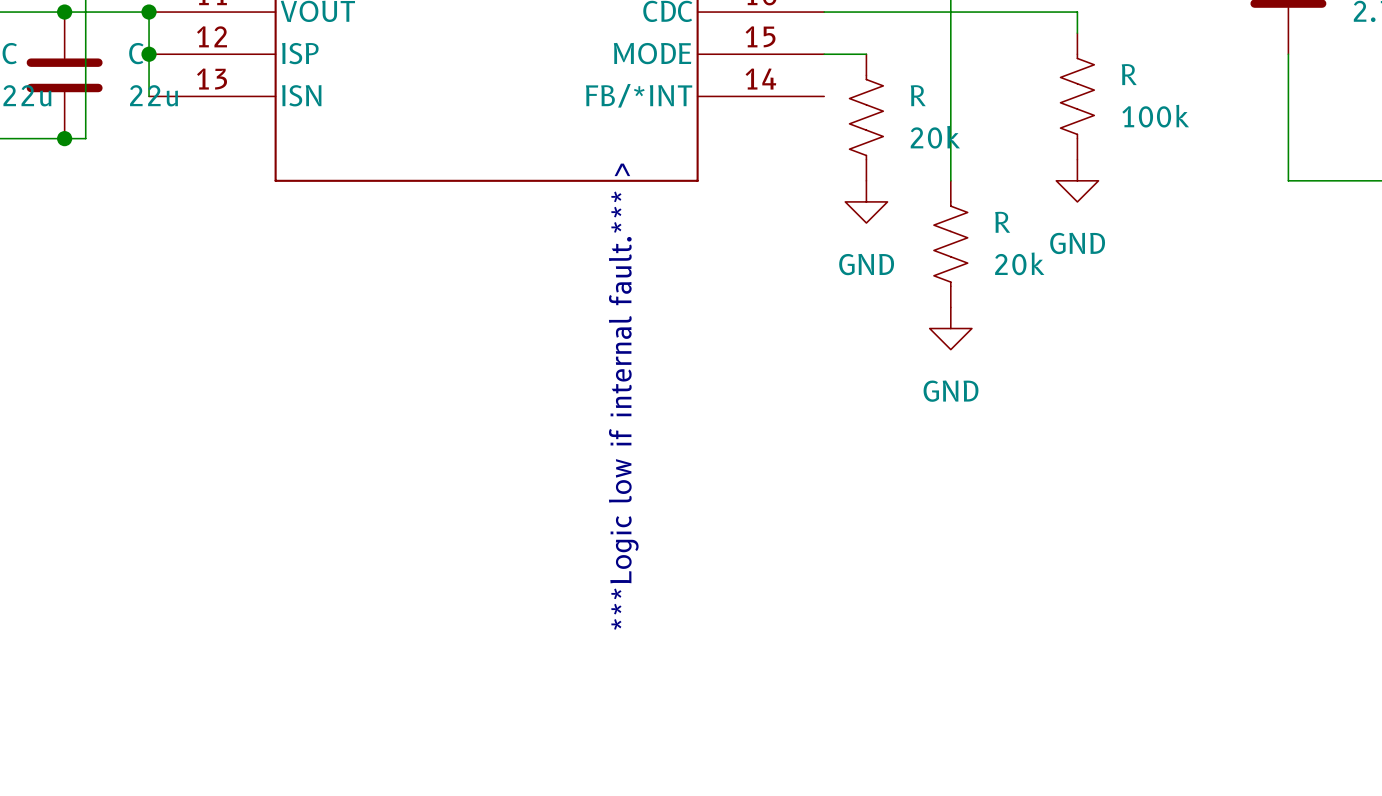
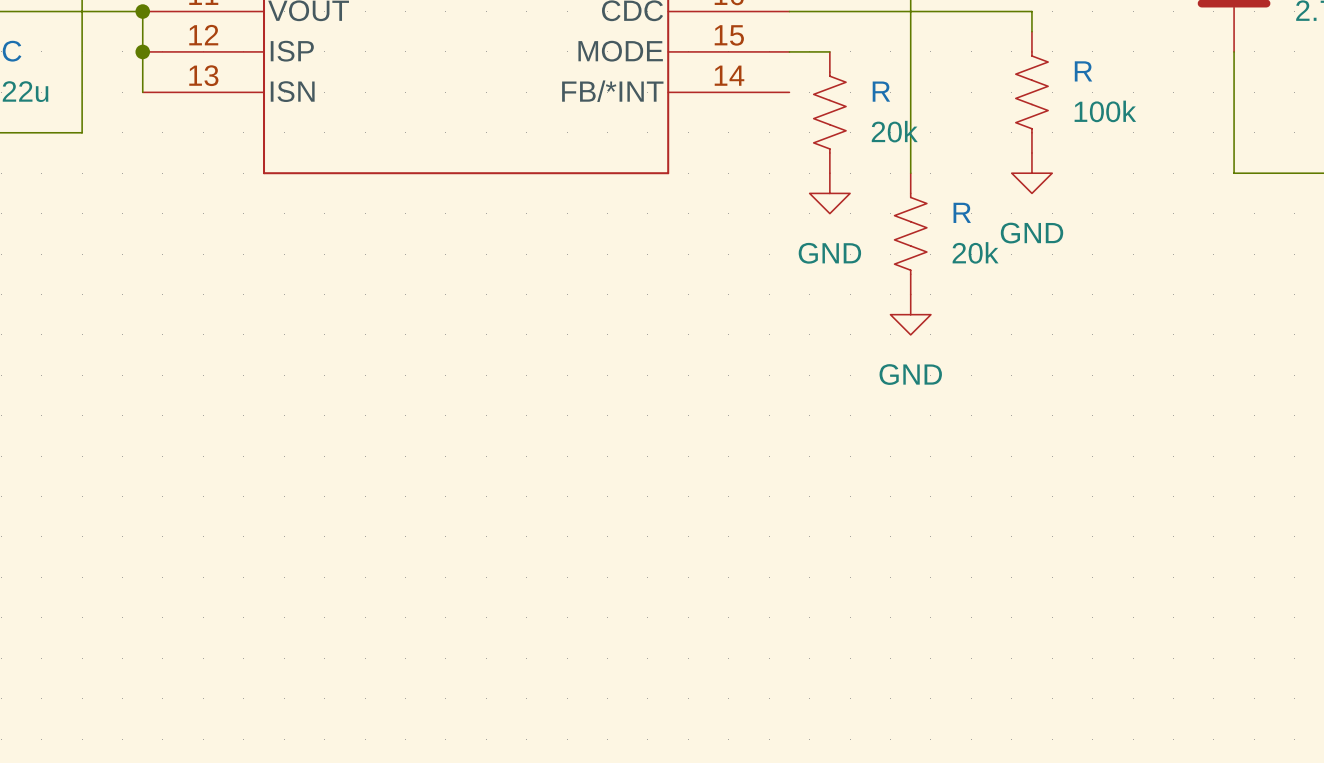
junction: (64, 12) -> none
C: 22u (64, 75) -> none
junction: (64, 138) -> none
text: ***Logic low if internal fault.*** > (623, 396) -> none

